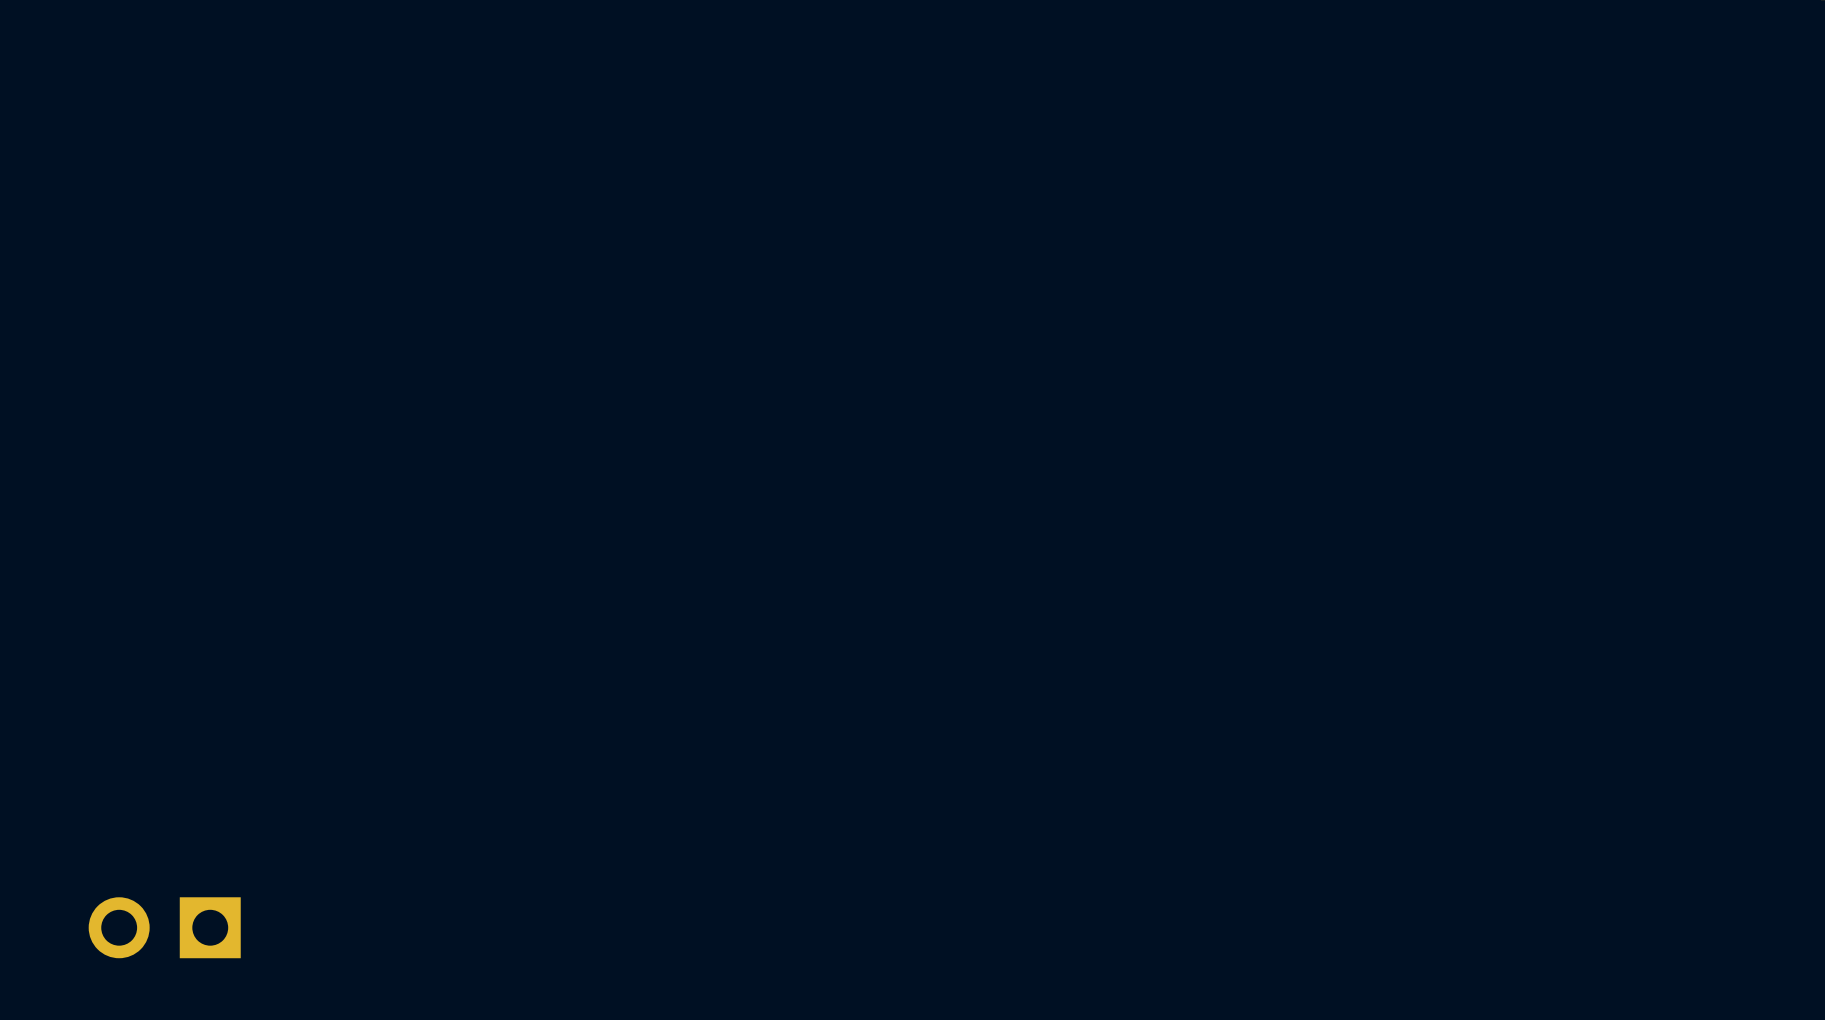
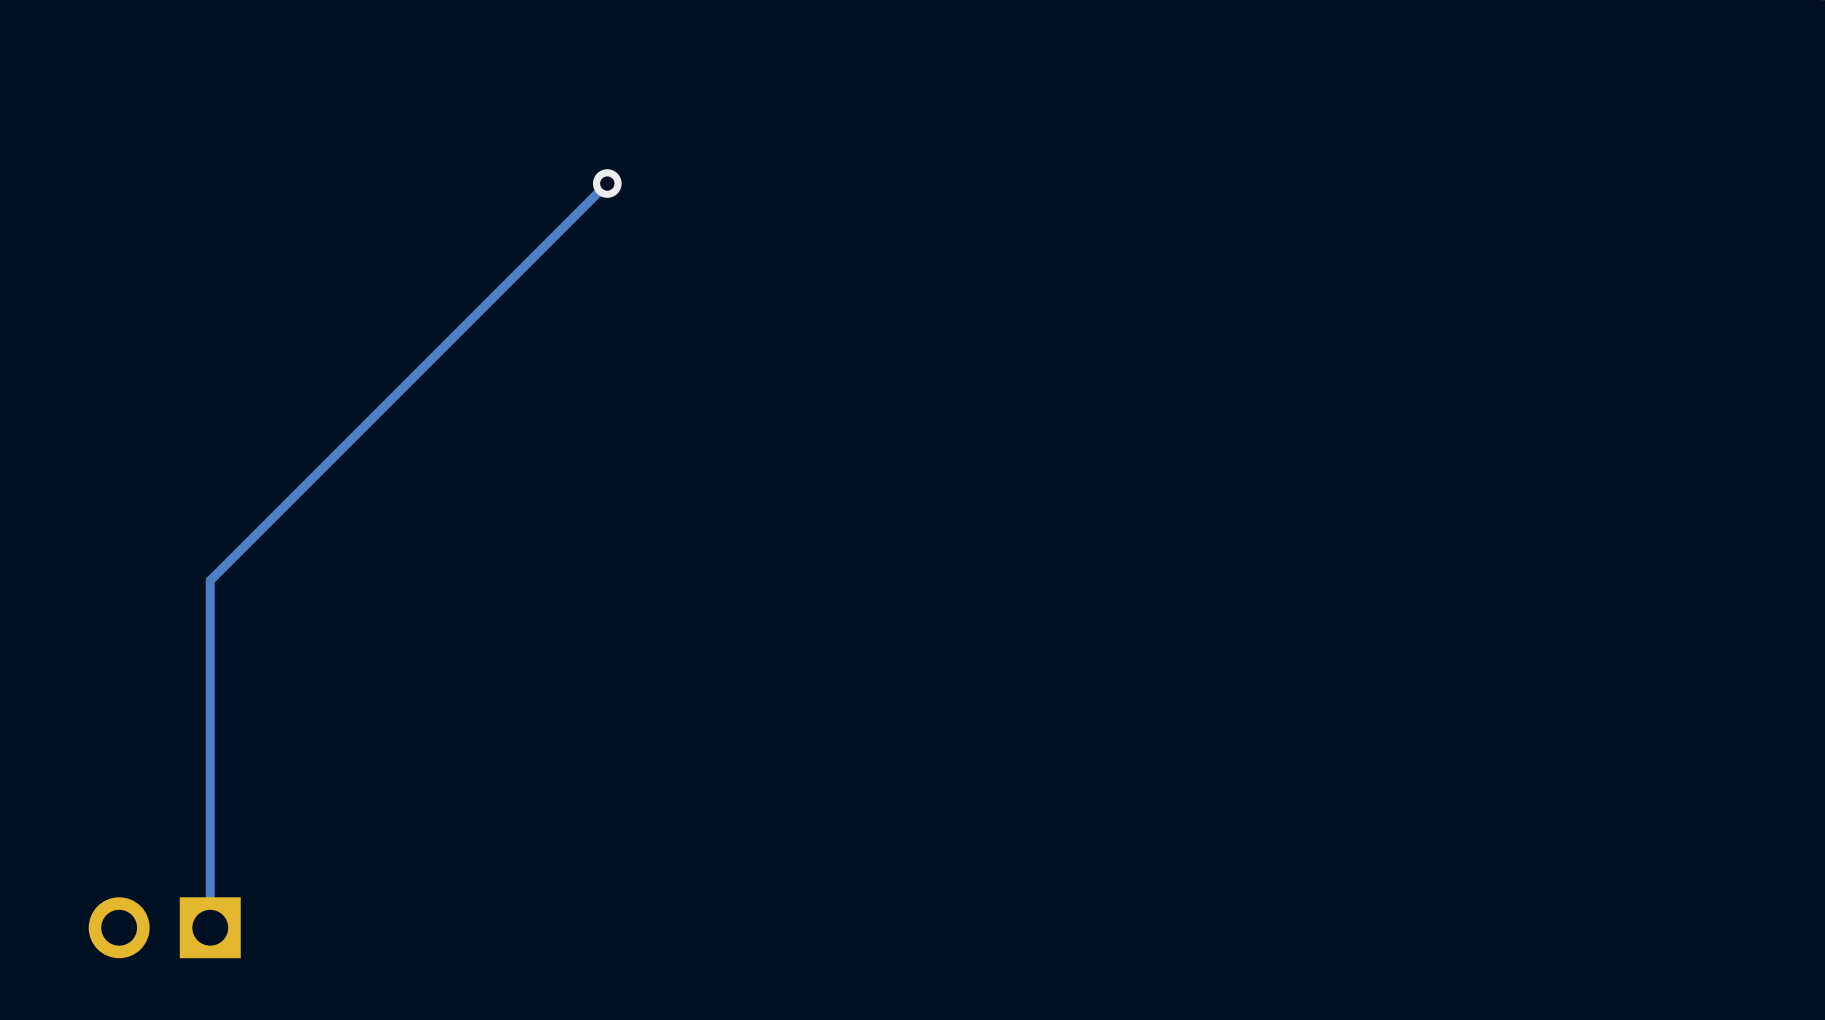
track: none -> (607, 183) (210, 580) (210, 927)
via: none -> (607, 183)

